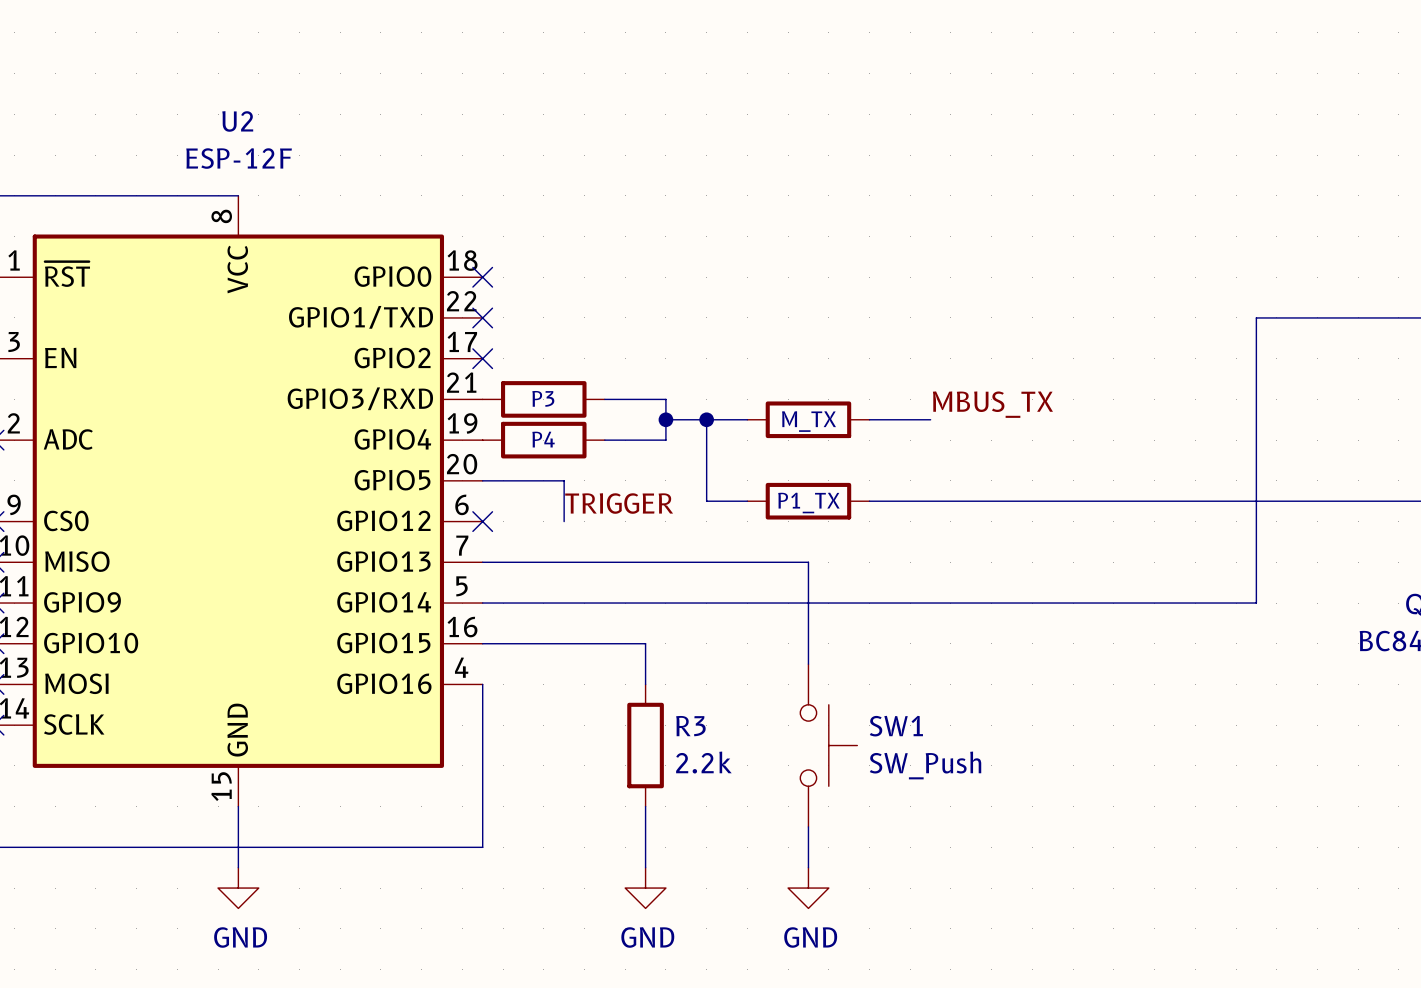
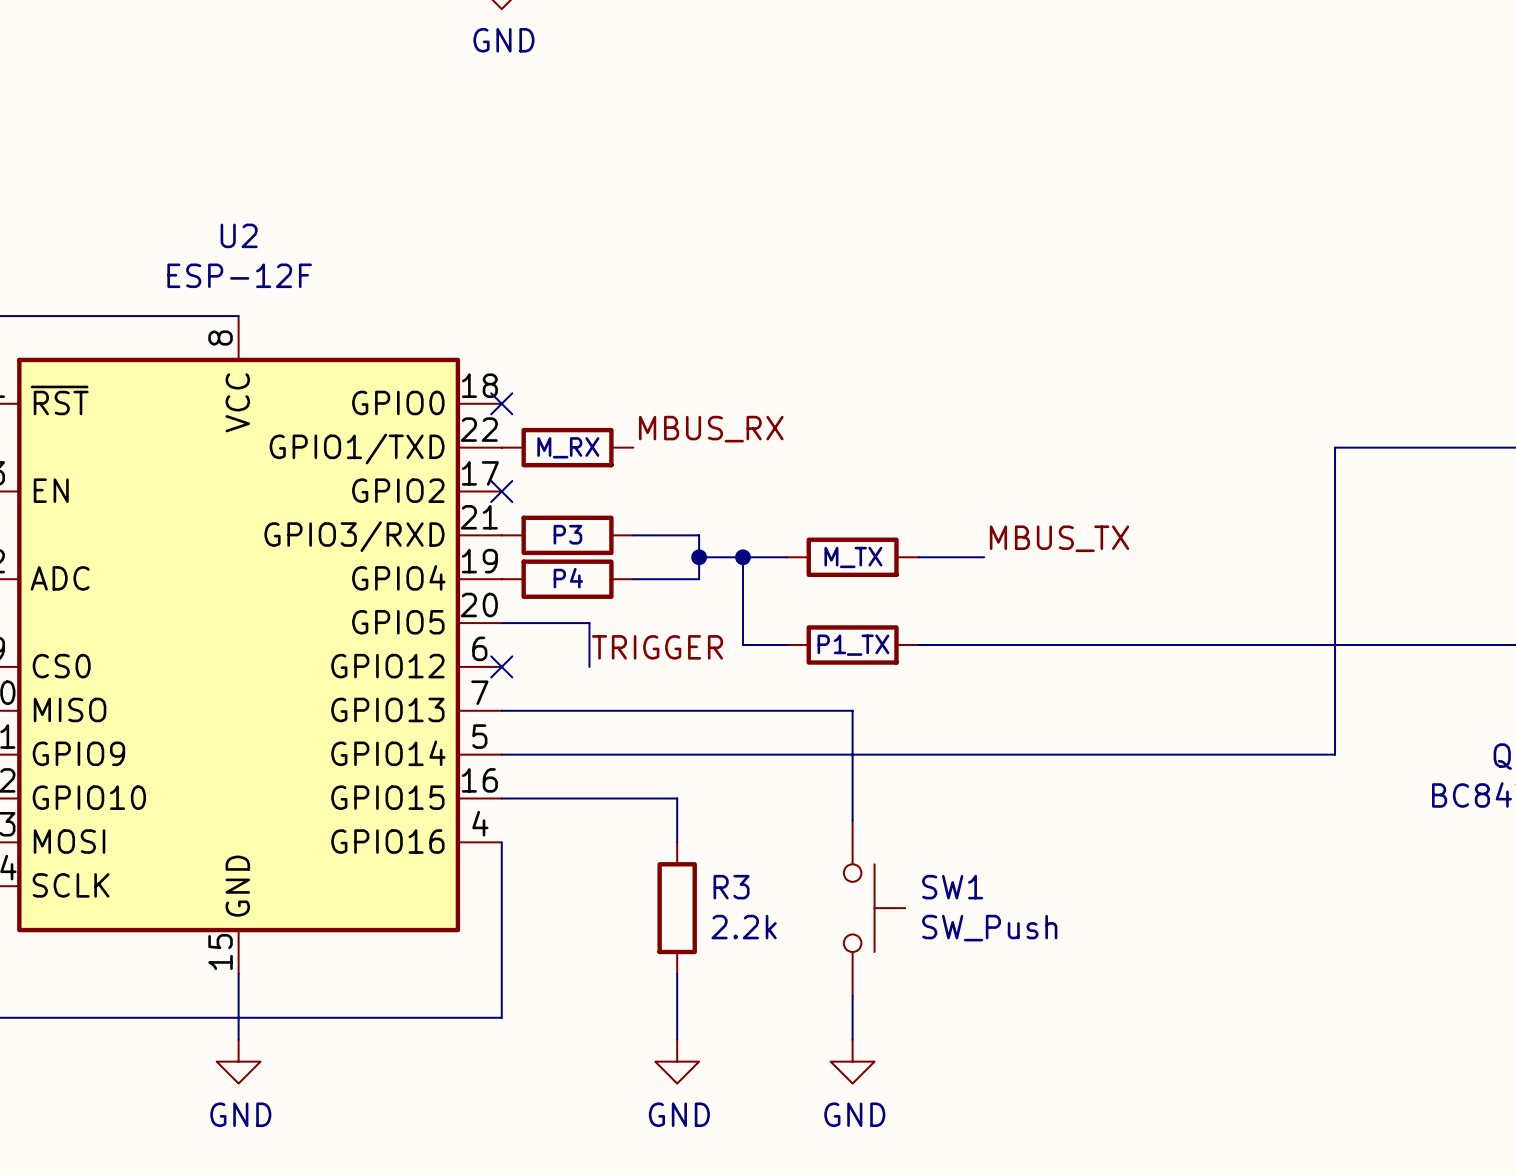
label: none -> MBUS_RX (711, 429)
no-connect mark: (482, 317) -> none
part: none -> M_RX (567, 447)

